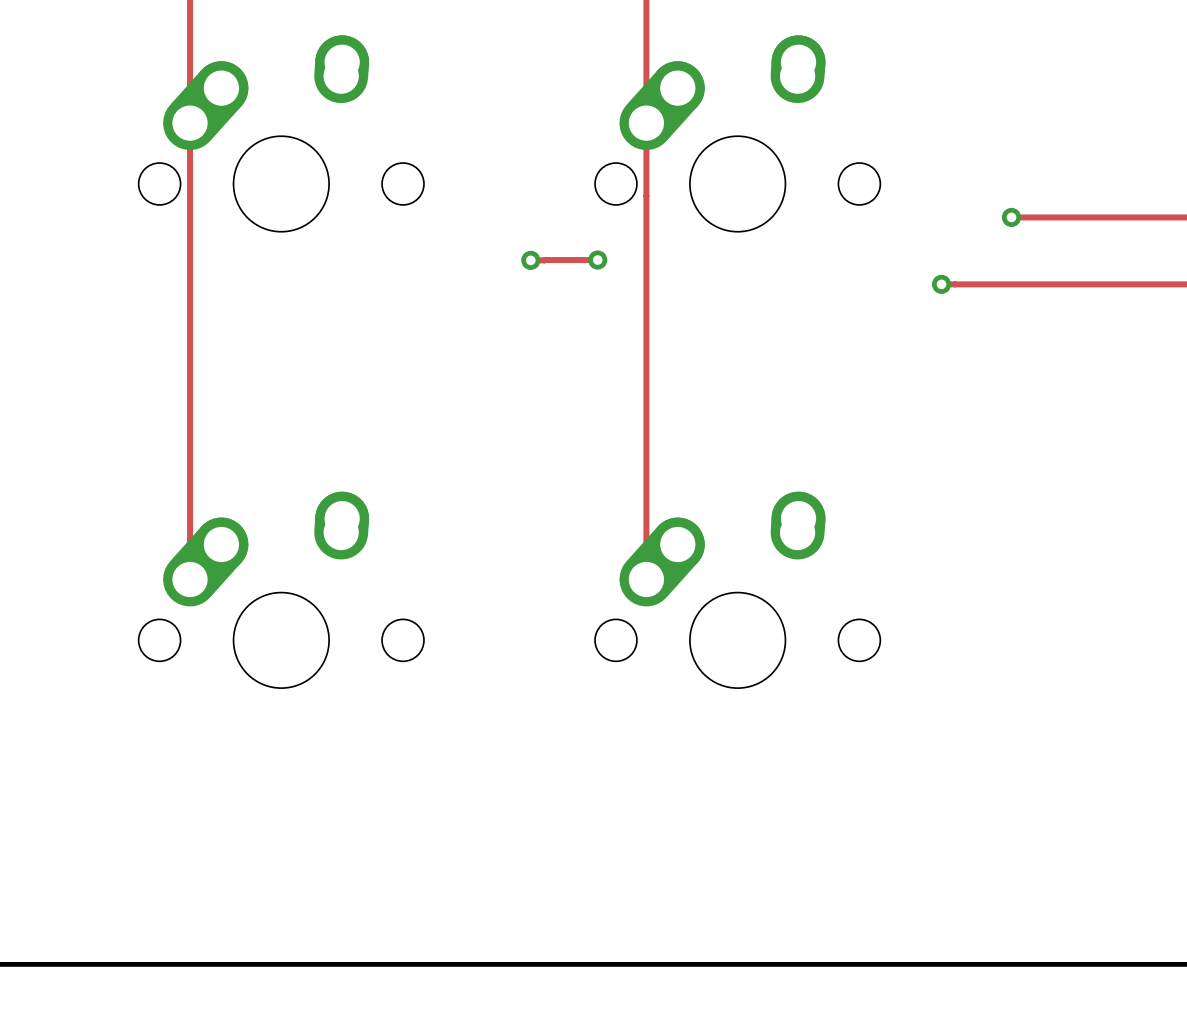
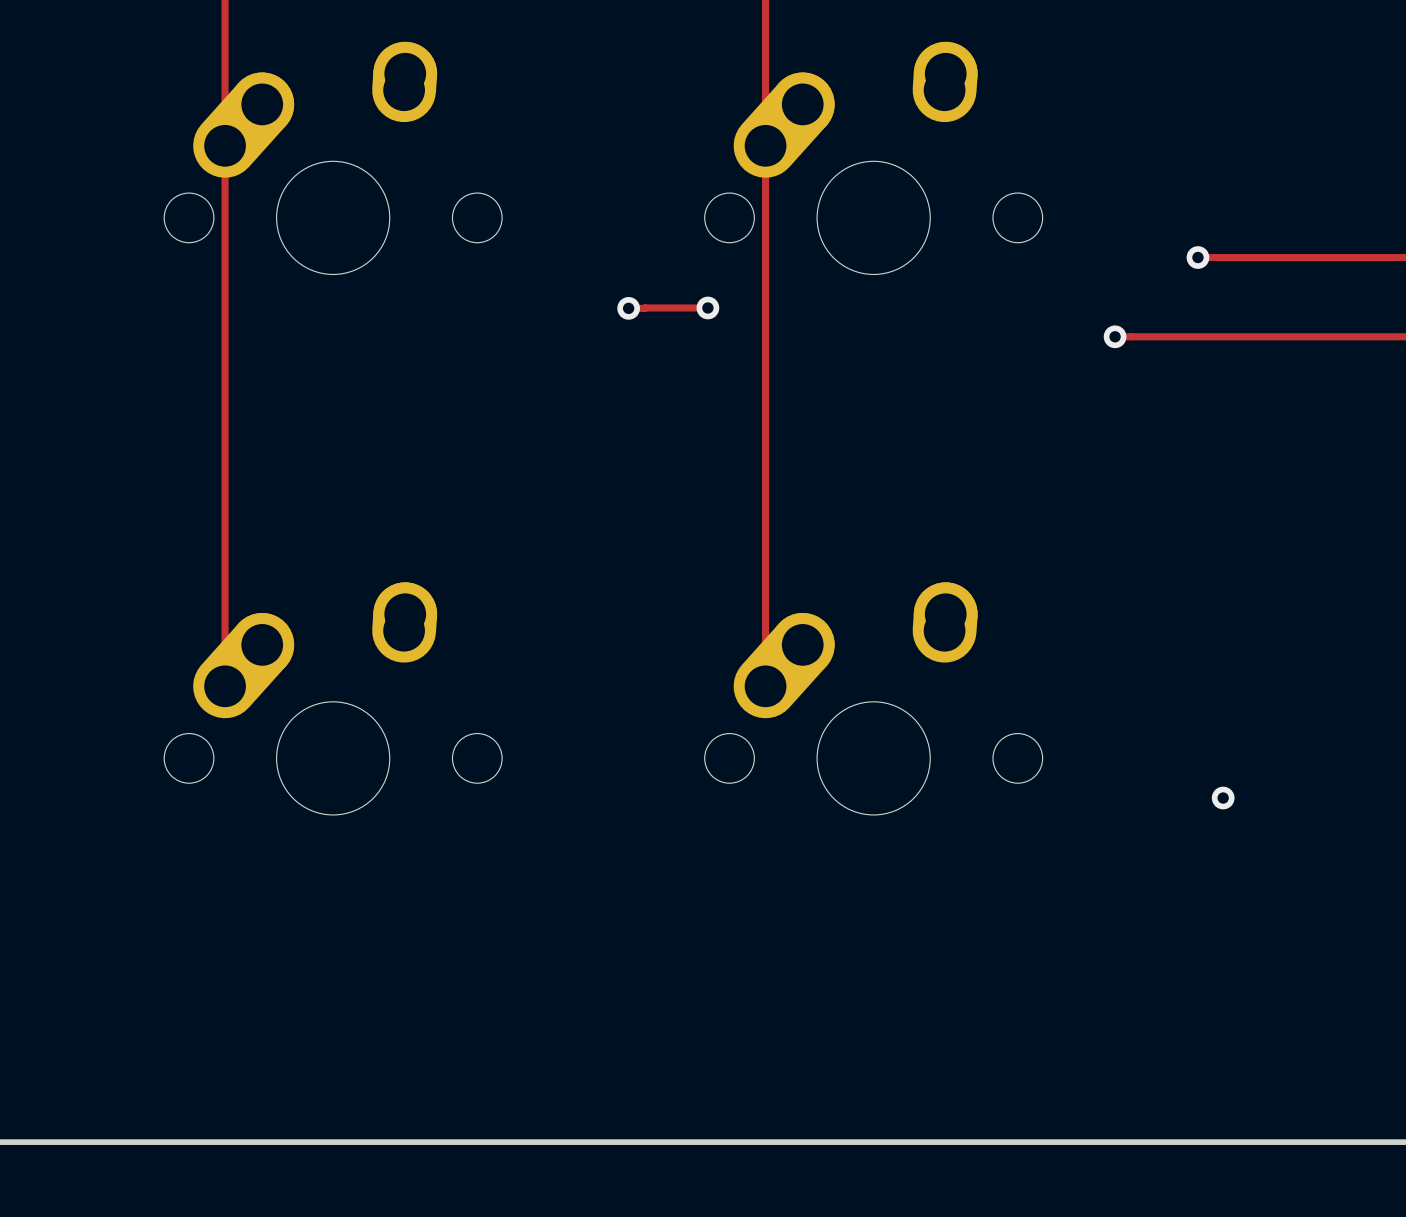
via: none -> (1223, 798)

